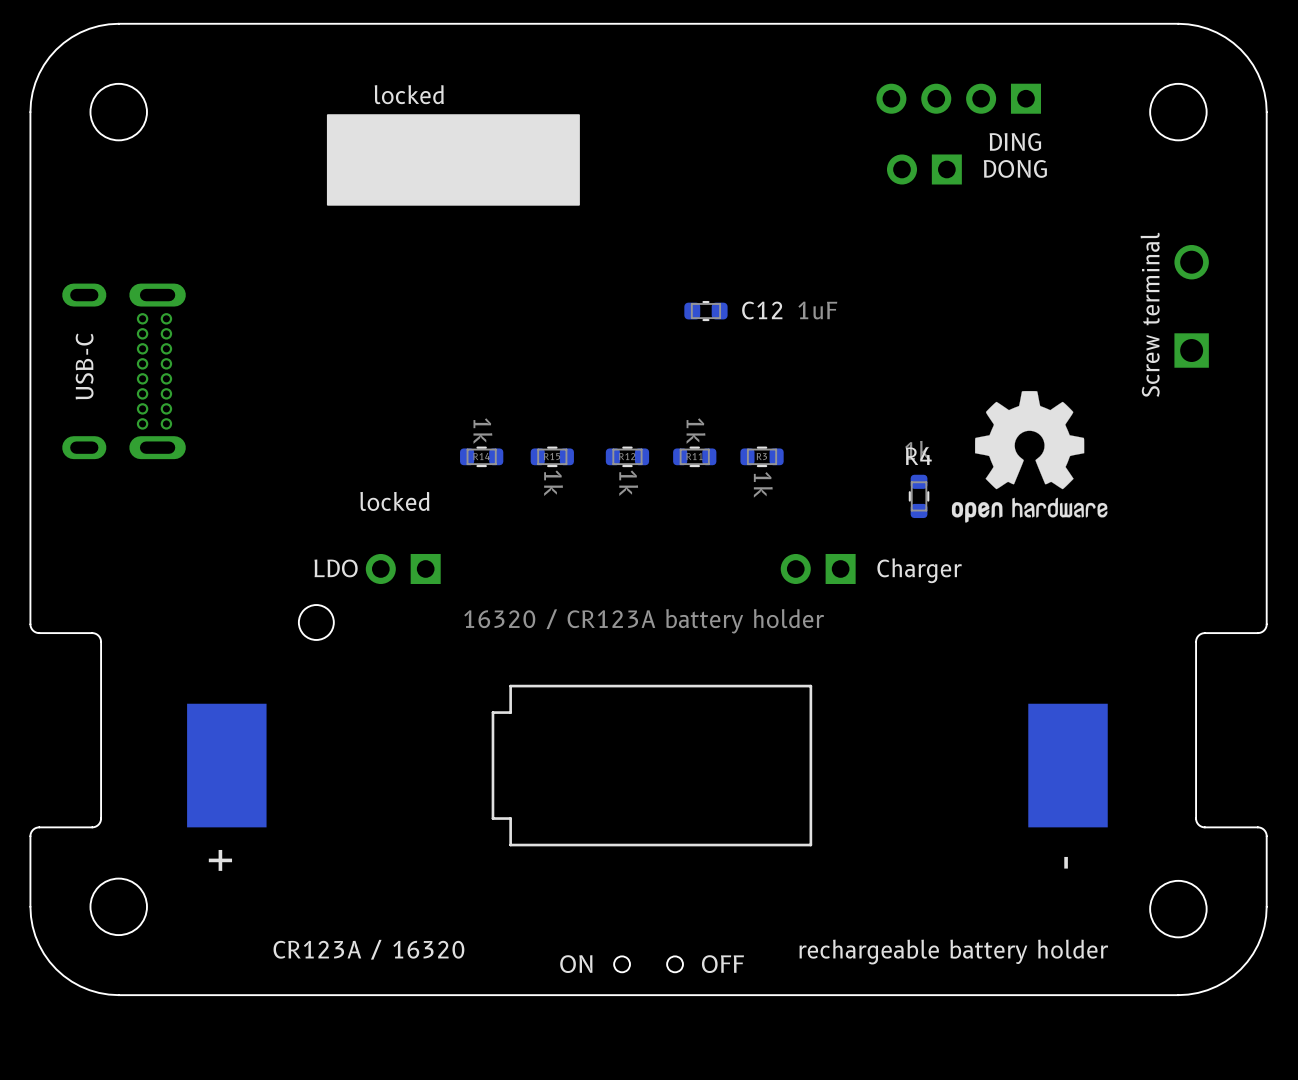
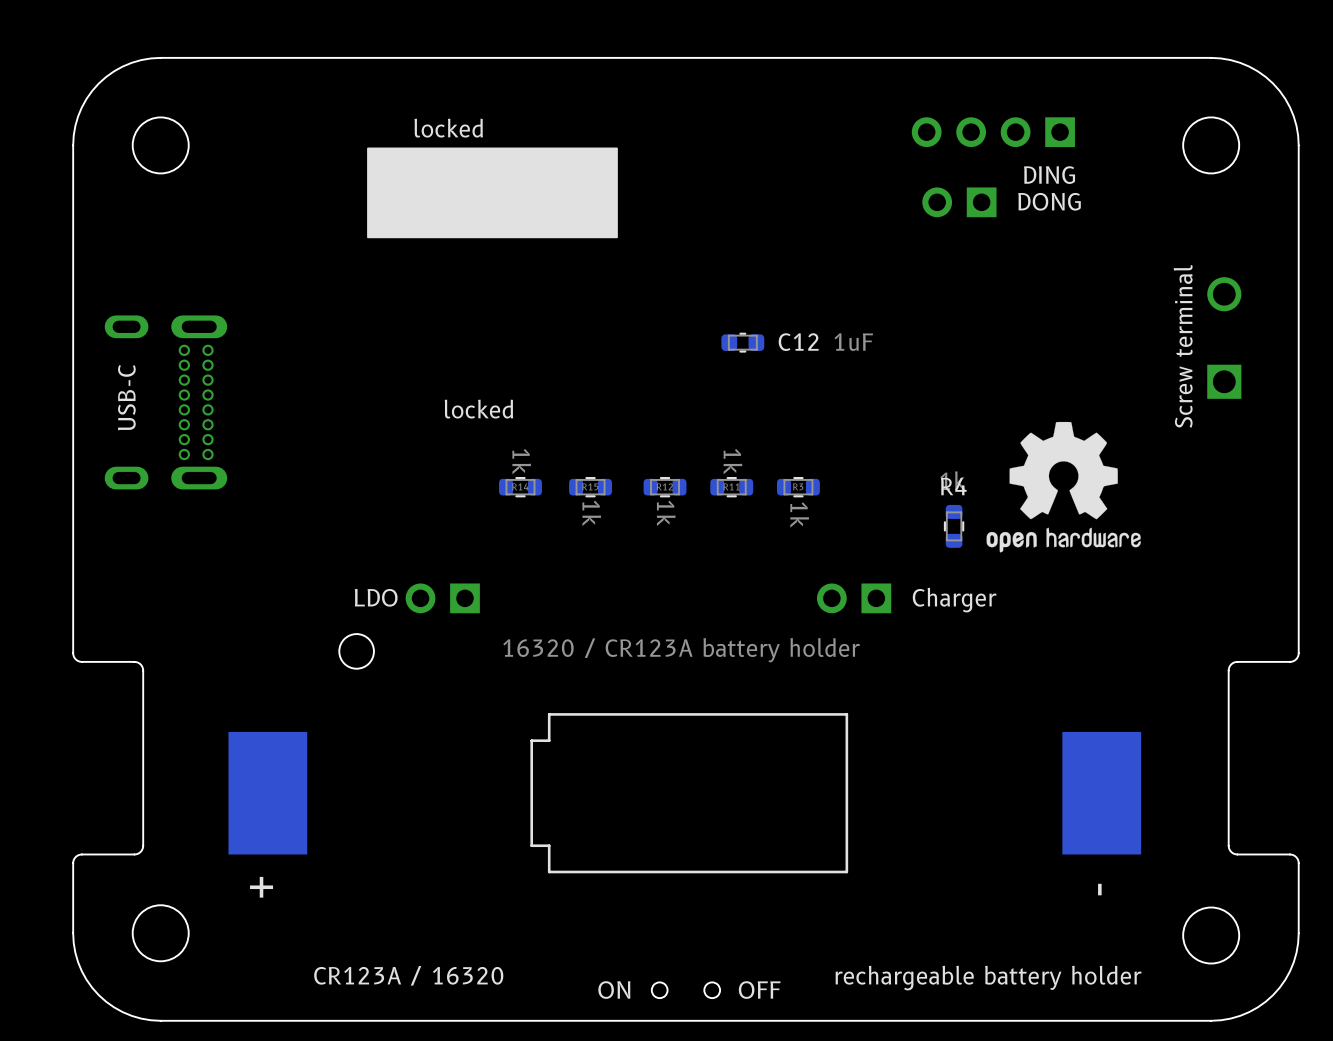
text position: locked (394, 501) -> locked (478, 409)

